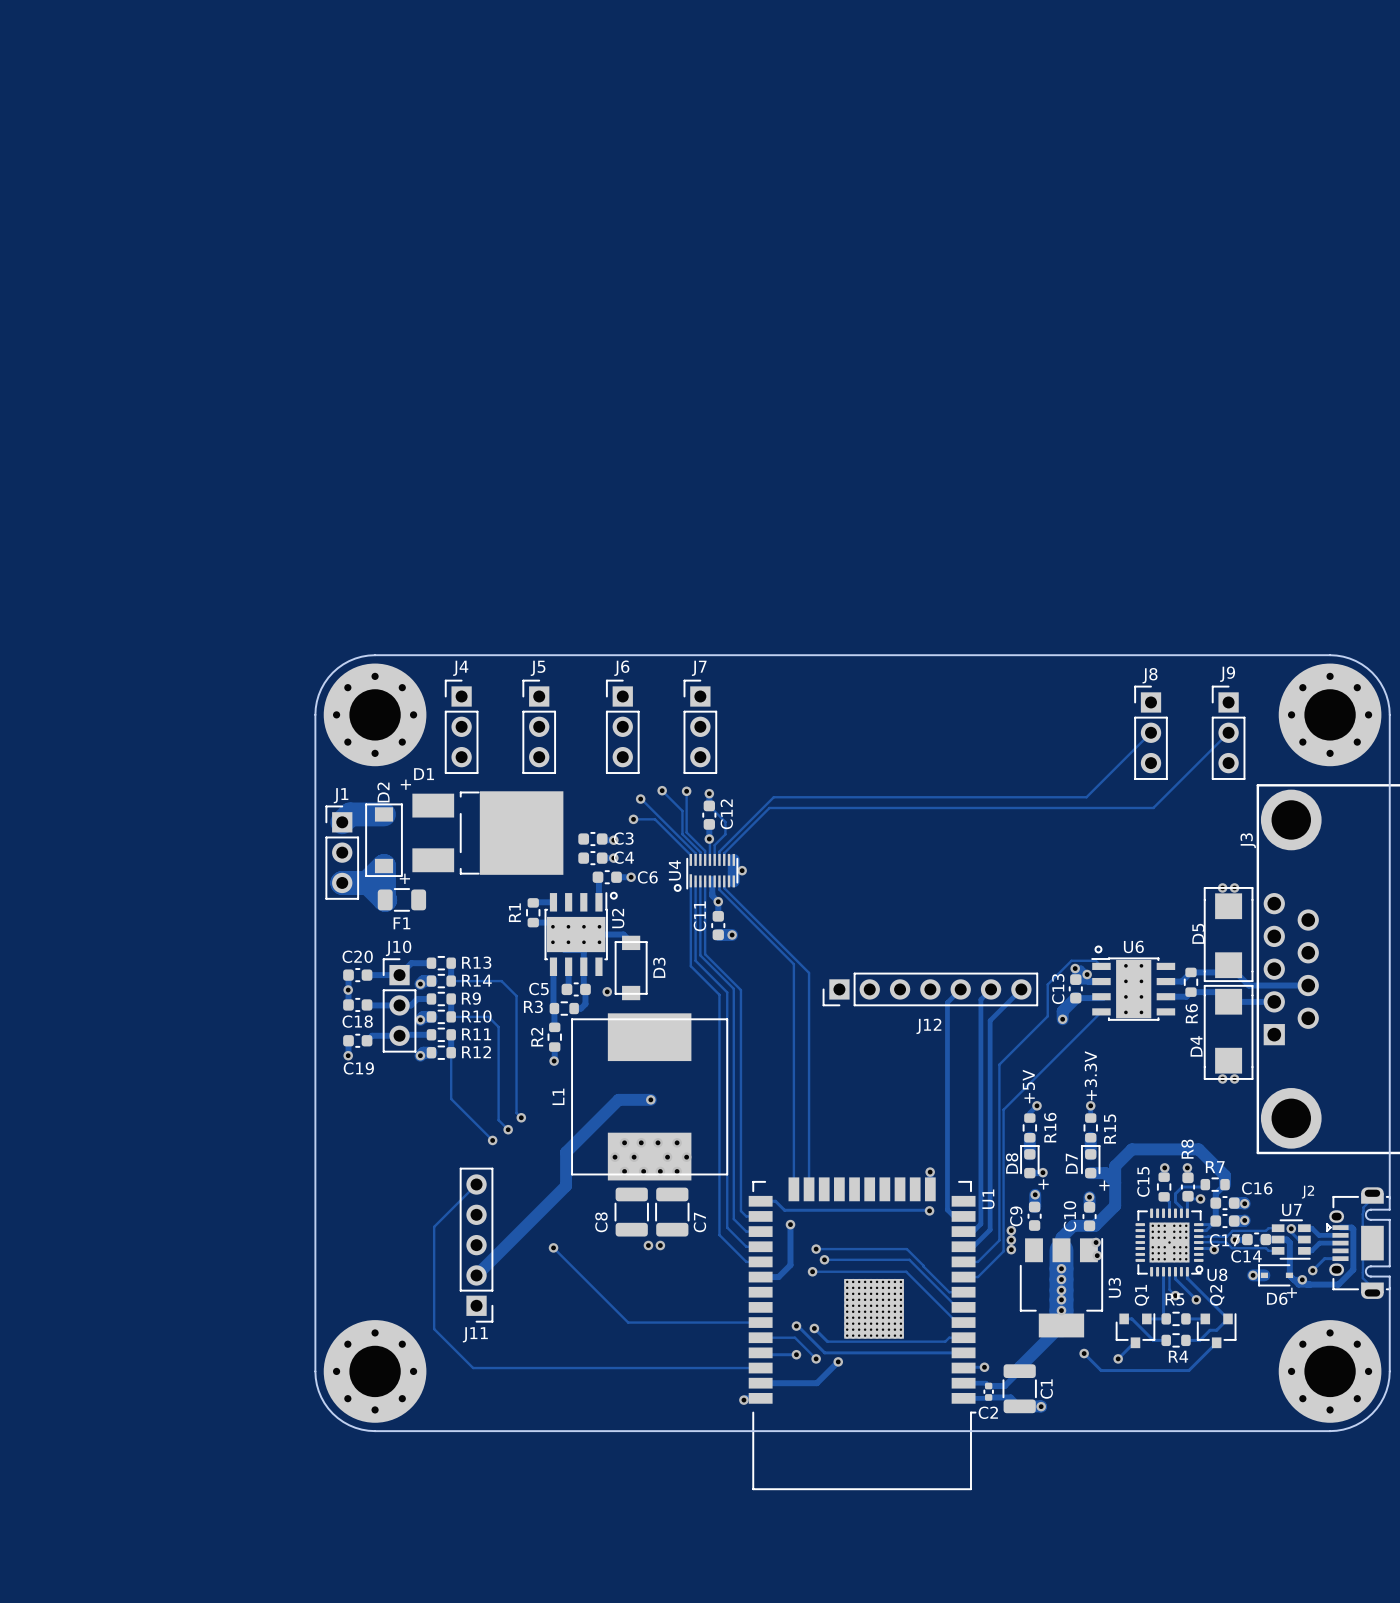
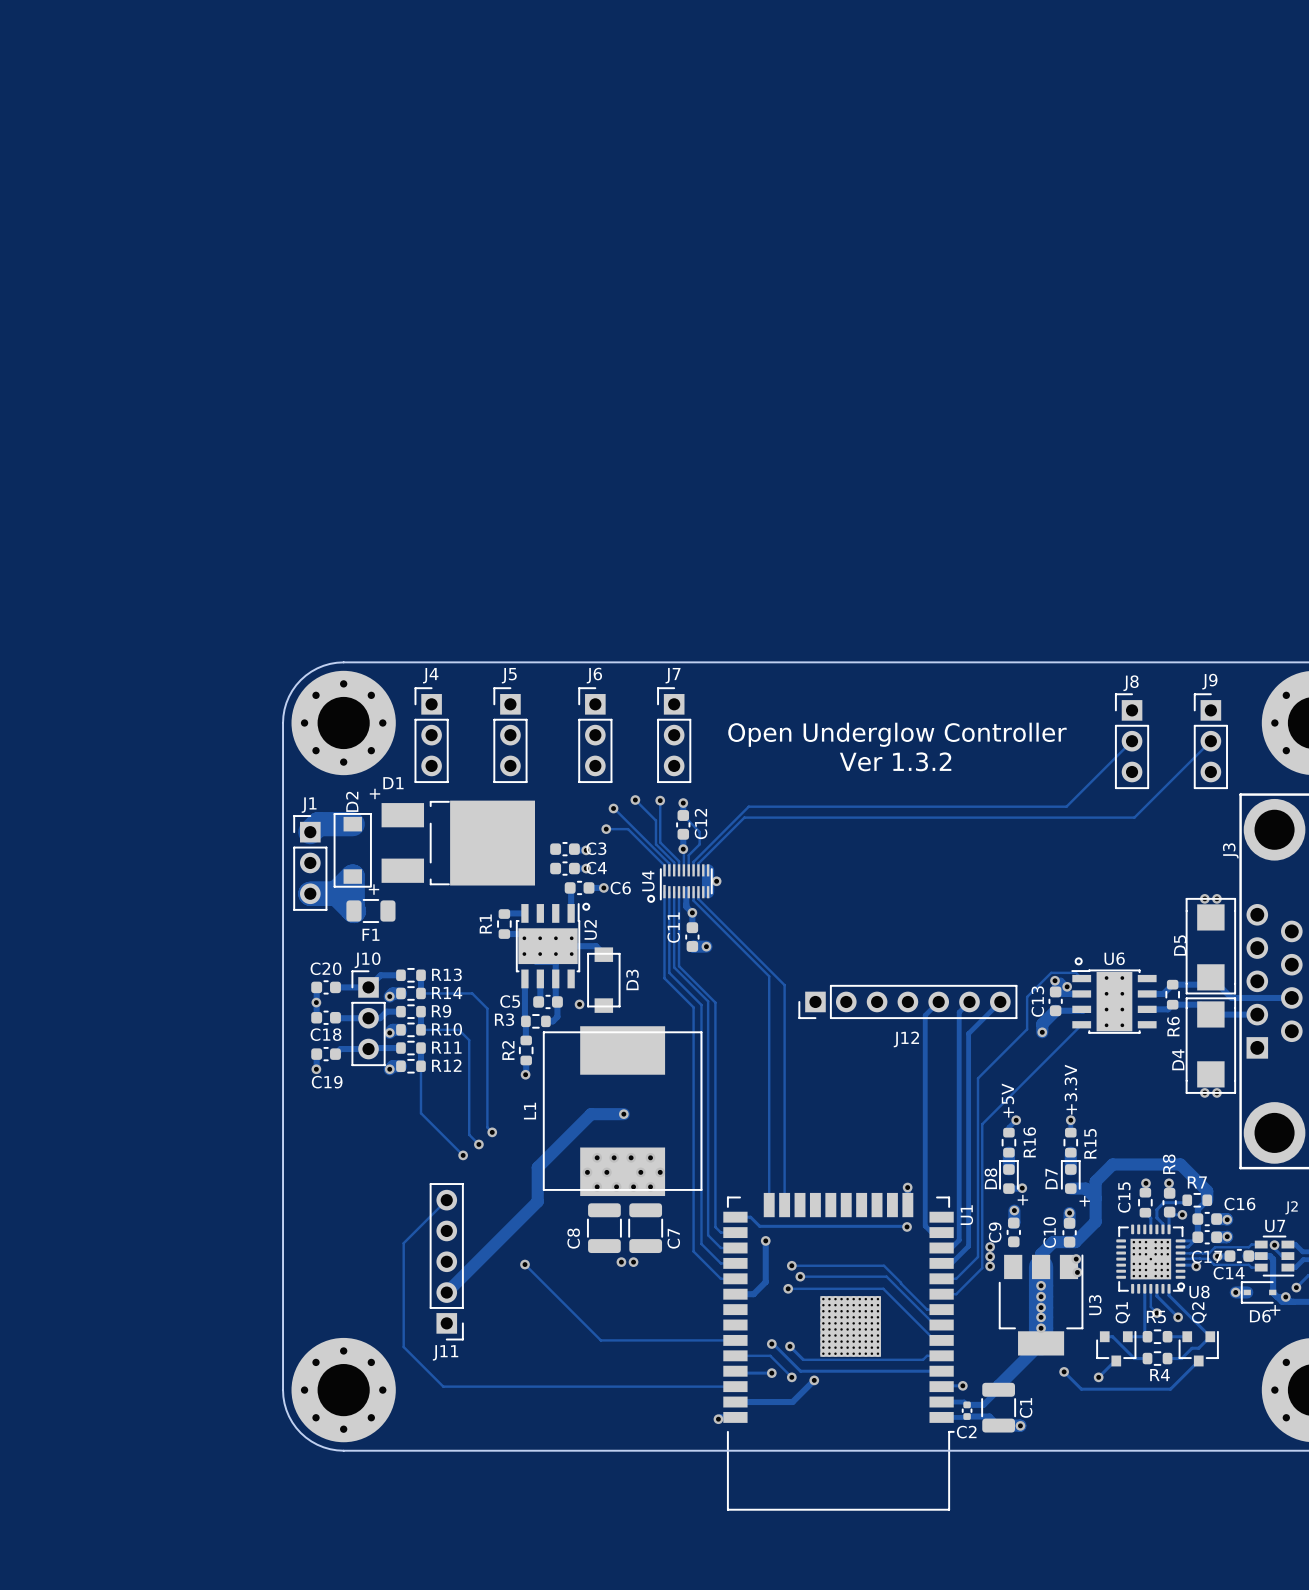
text: none -> Open Underglow Controller (897, 734)
text: none -> Ver 1.3.2 (895, 761)

